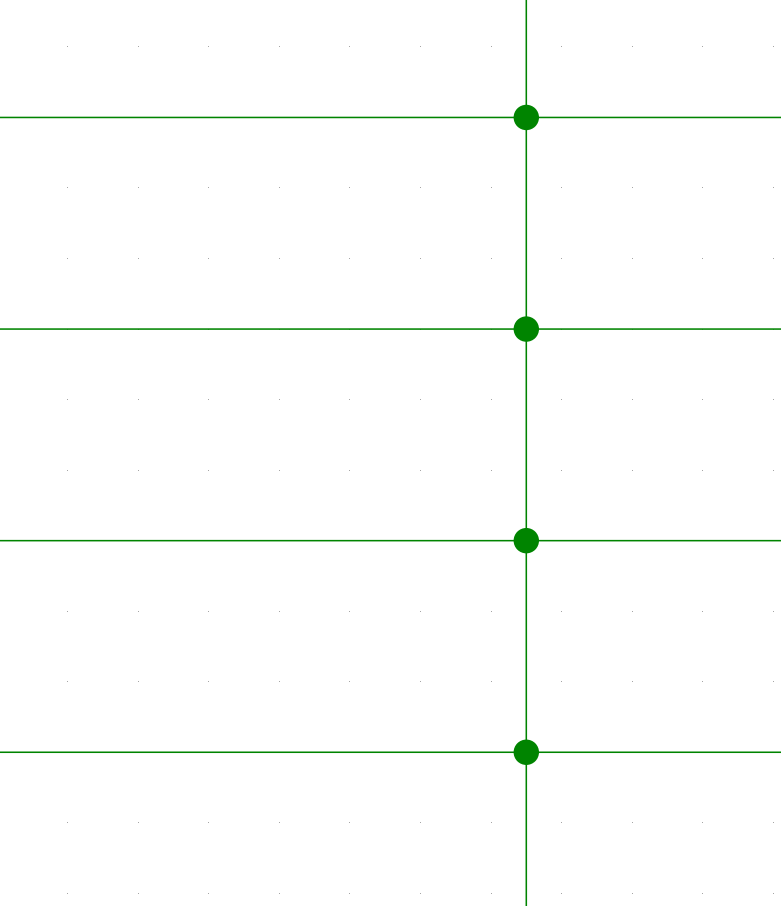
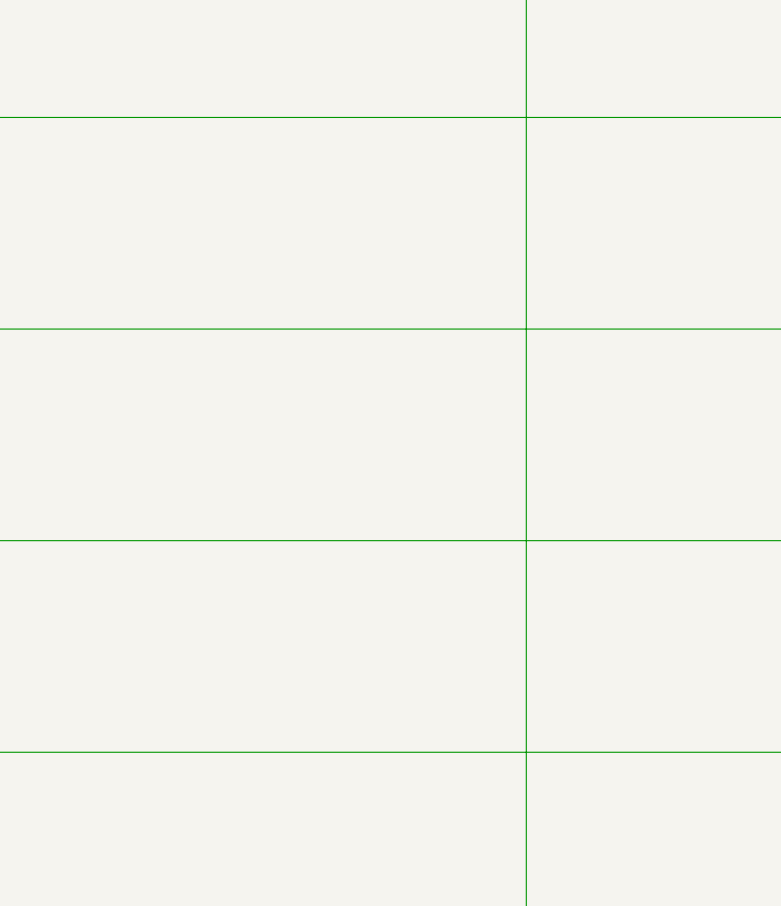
junction: (526, 117) -> none
junction: (526, 329) -> none
junction: (526, 540) -> none
junction: (526, 752) -> none

